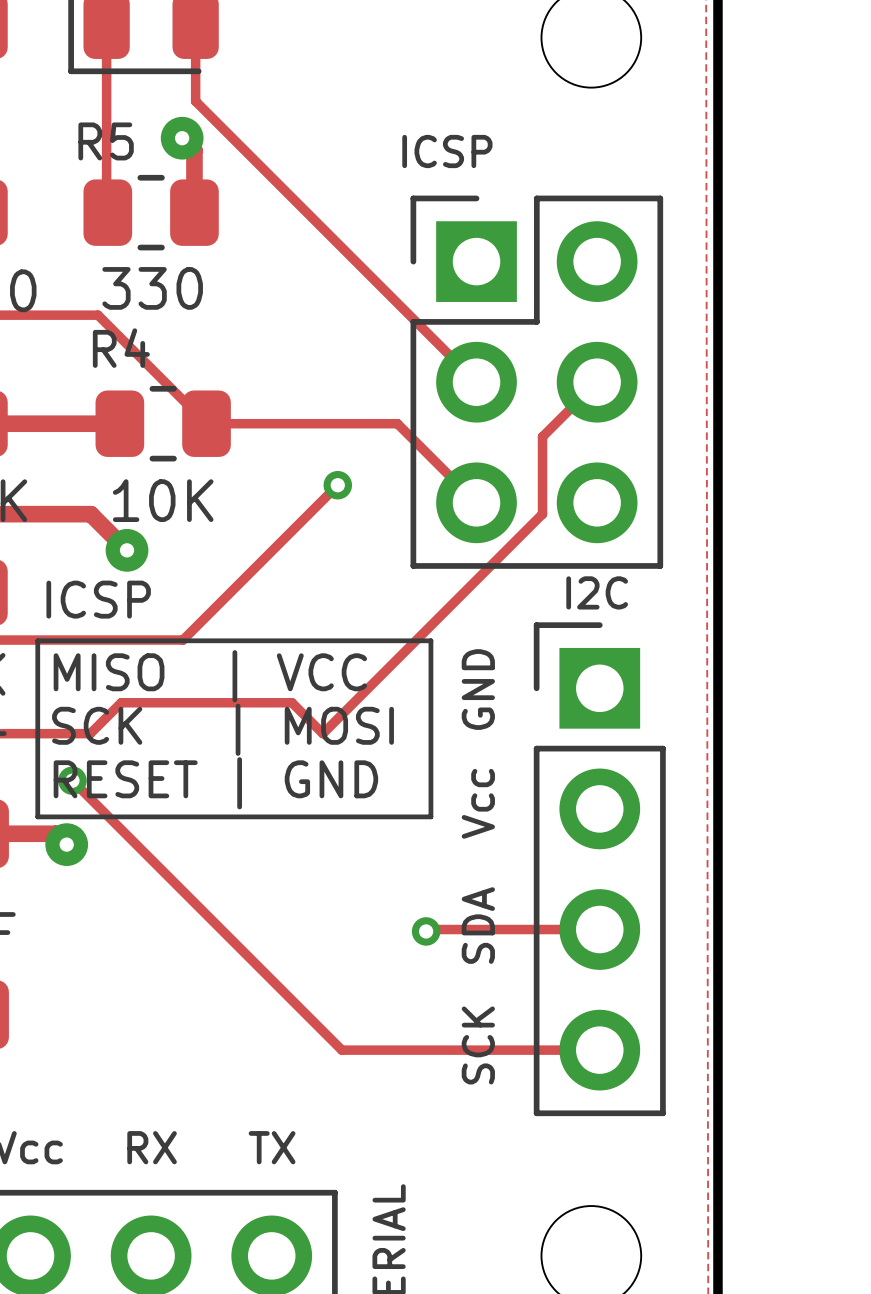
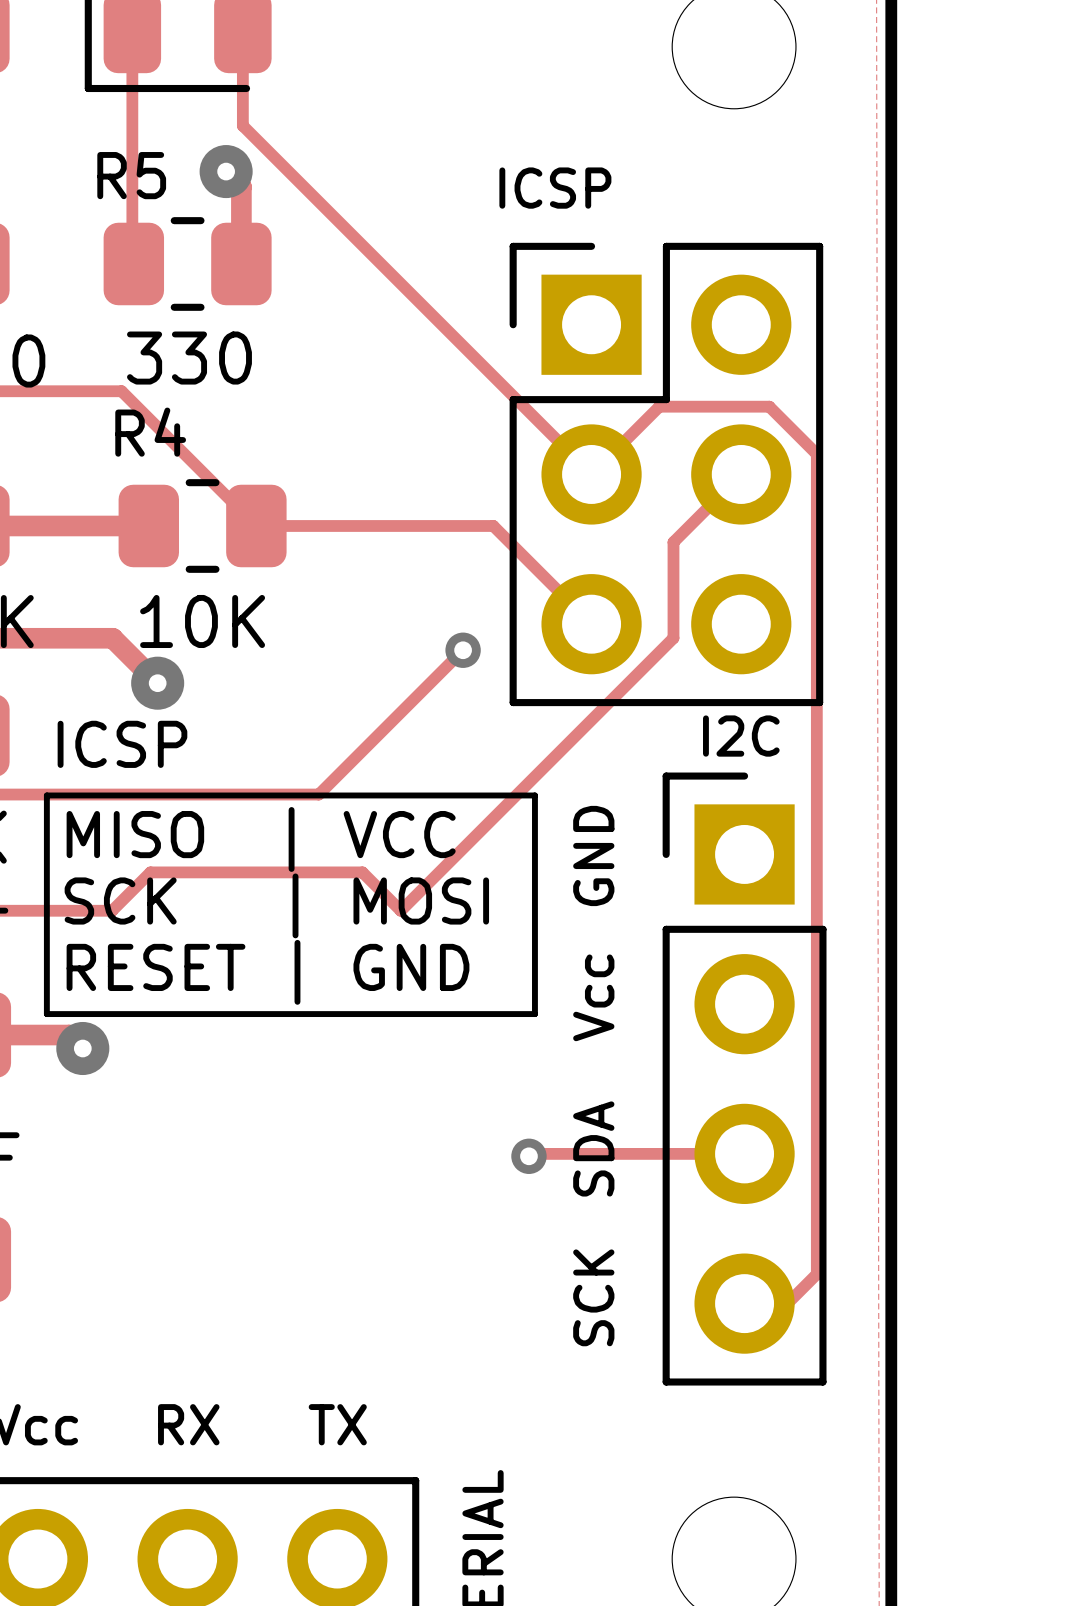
track: none -> (591, 474) (659, 406) (769, 406) (816, 454) (816, 1274) (749, 1341)
track: (337, 485) (182, 640) -> (463, 650) (318, 794) (227, 794)
via position: (337, 485) -> (463, 650)
track: (72, 780) (341, 1050) (599, 1050) -> none
via: (72, 780) -> none

